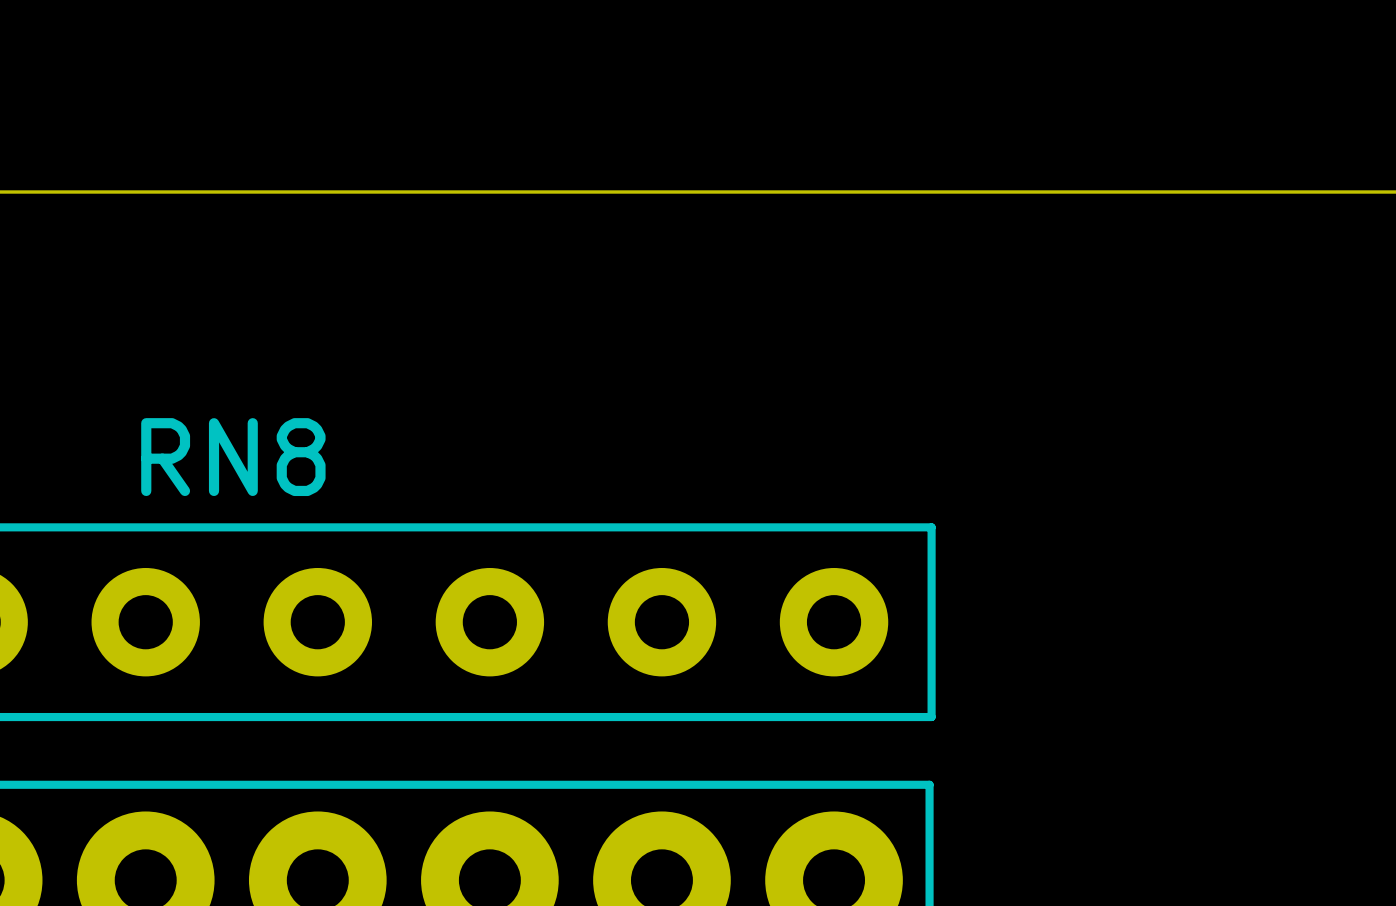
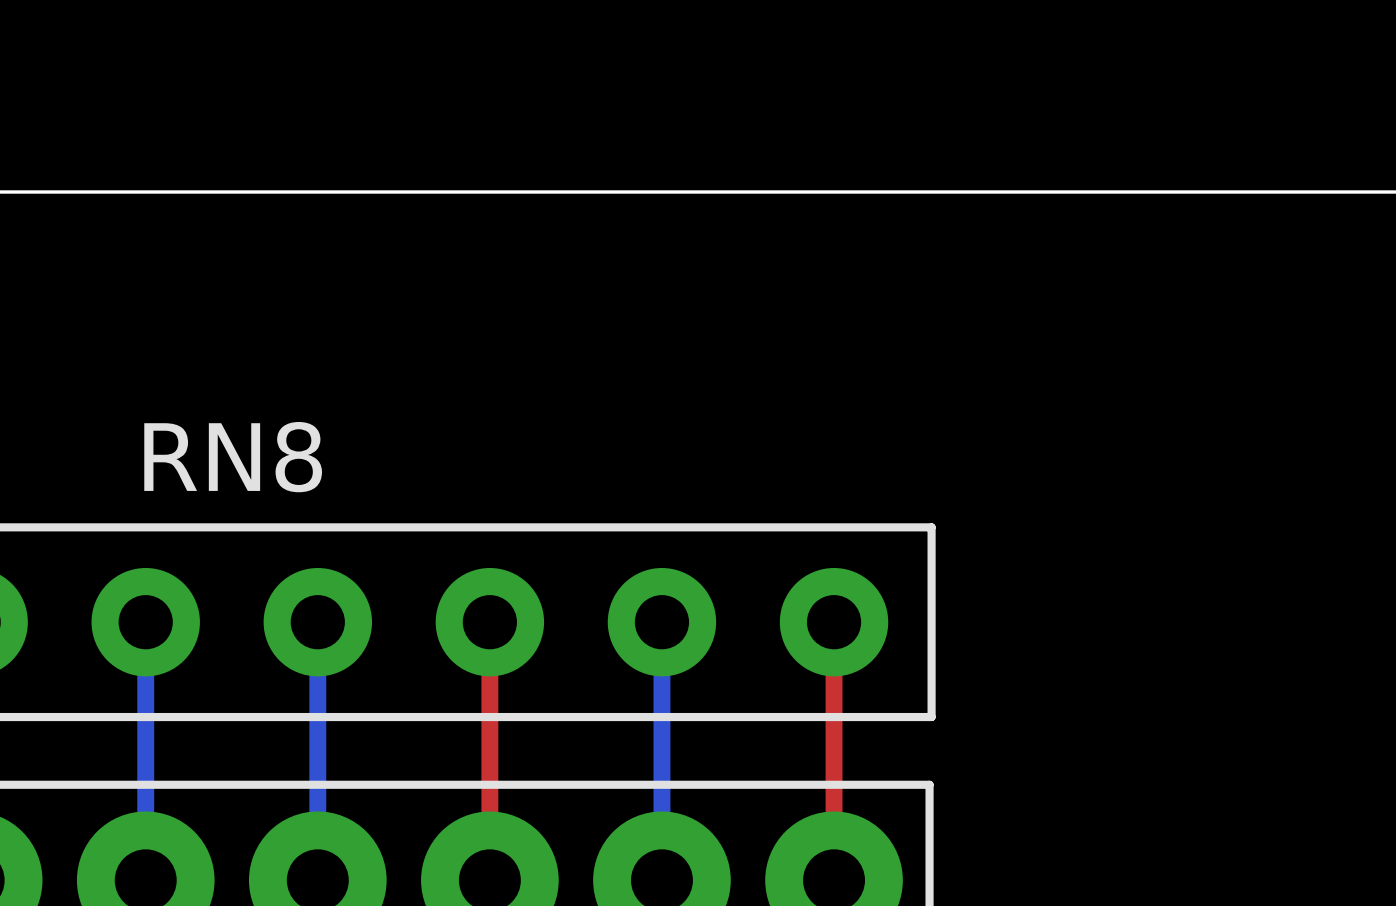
bottom track: none -> (145, 622) (145, 880)
bottom track: none -> (317, 622) (317, 880)
top track: none -> (489, 622) (489, 880)
bottom track: none -> (661, 622) (661, 880)
top track: none -> (834, 622) (834, 880)

